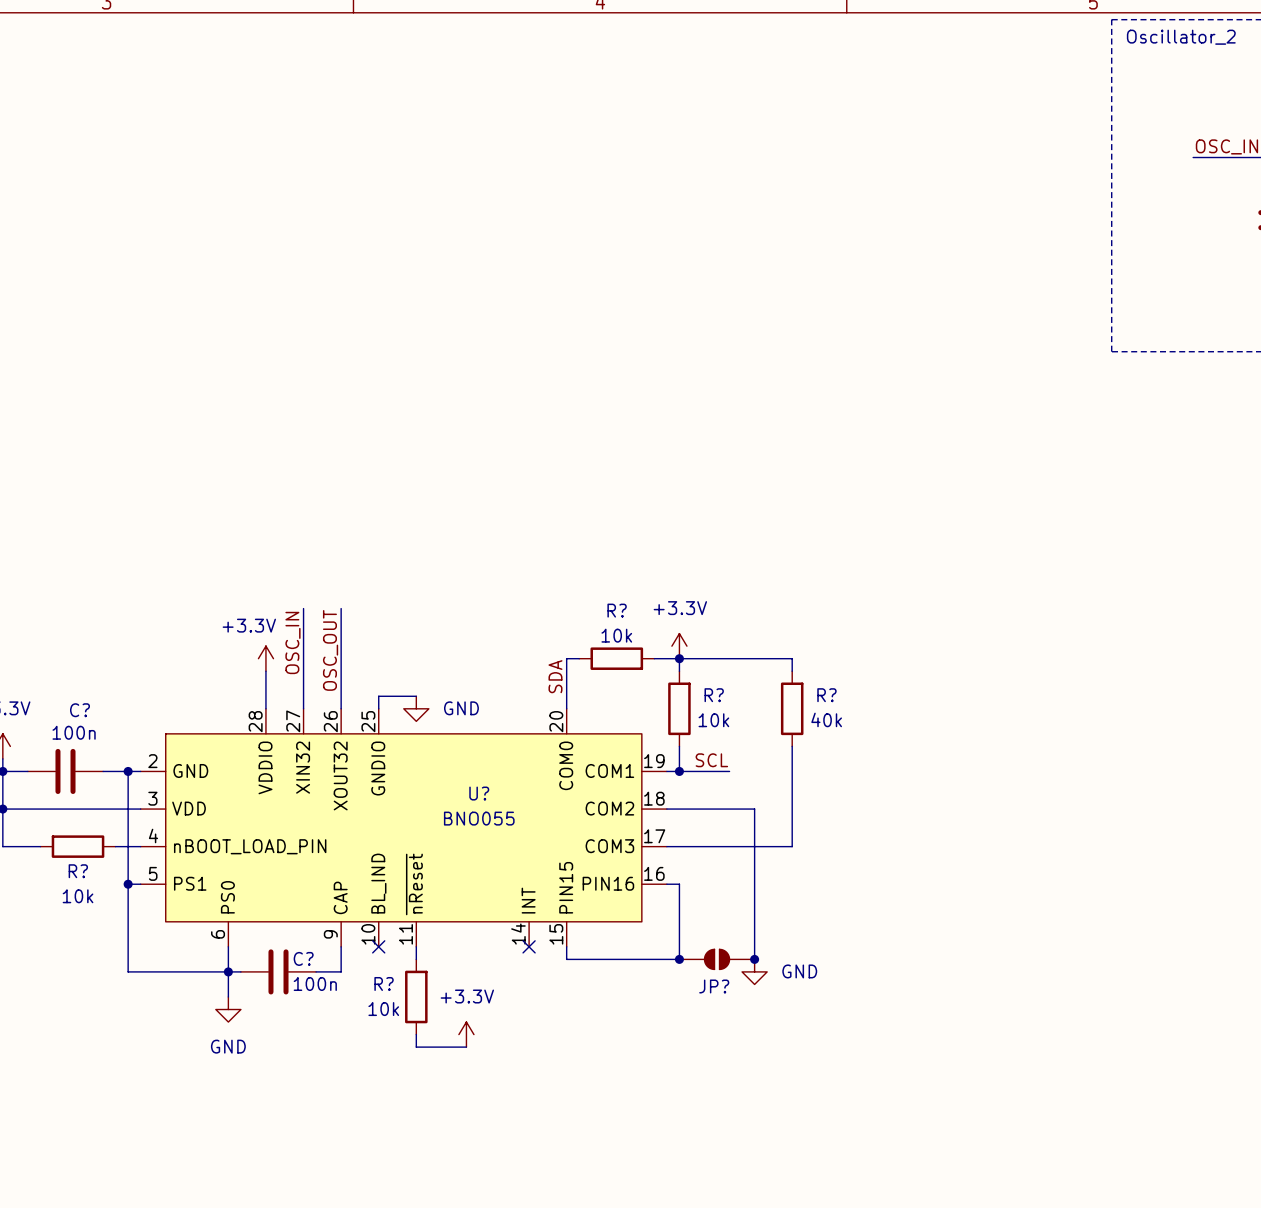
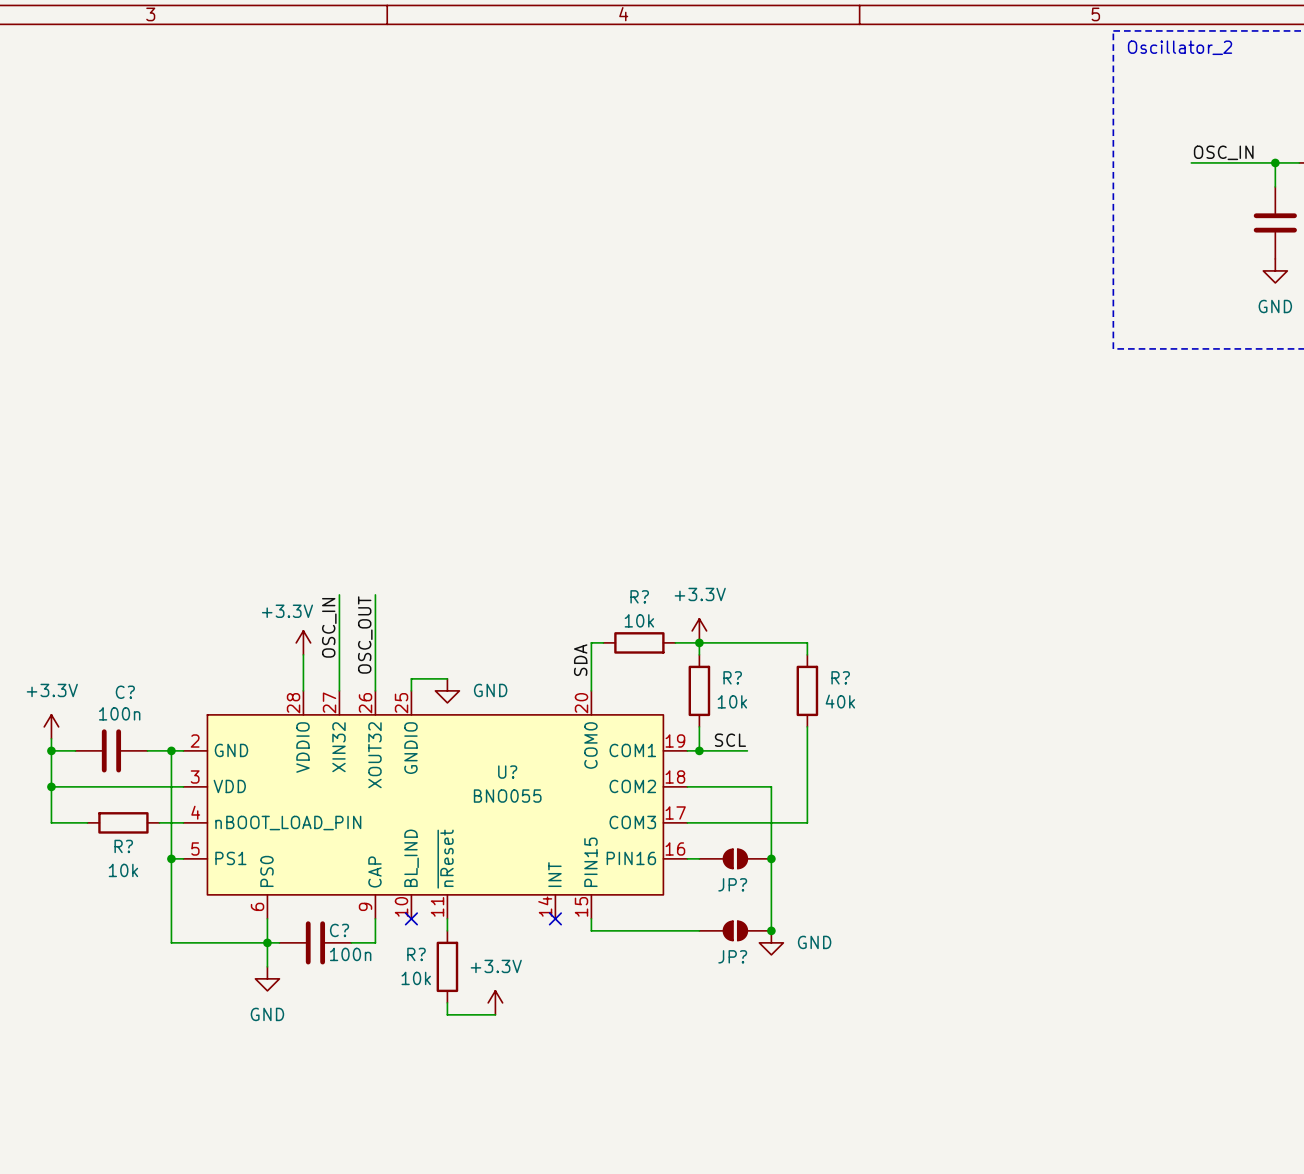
wire: (679, 884) (679, 959) -> none
JP?: none -> (735, 858)
junction: none -> (771, 858)
junction: (679, 959) -> none

